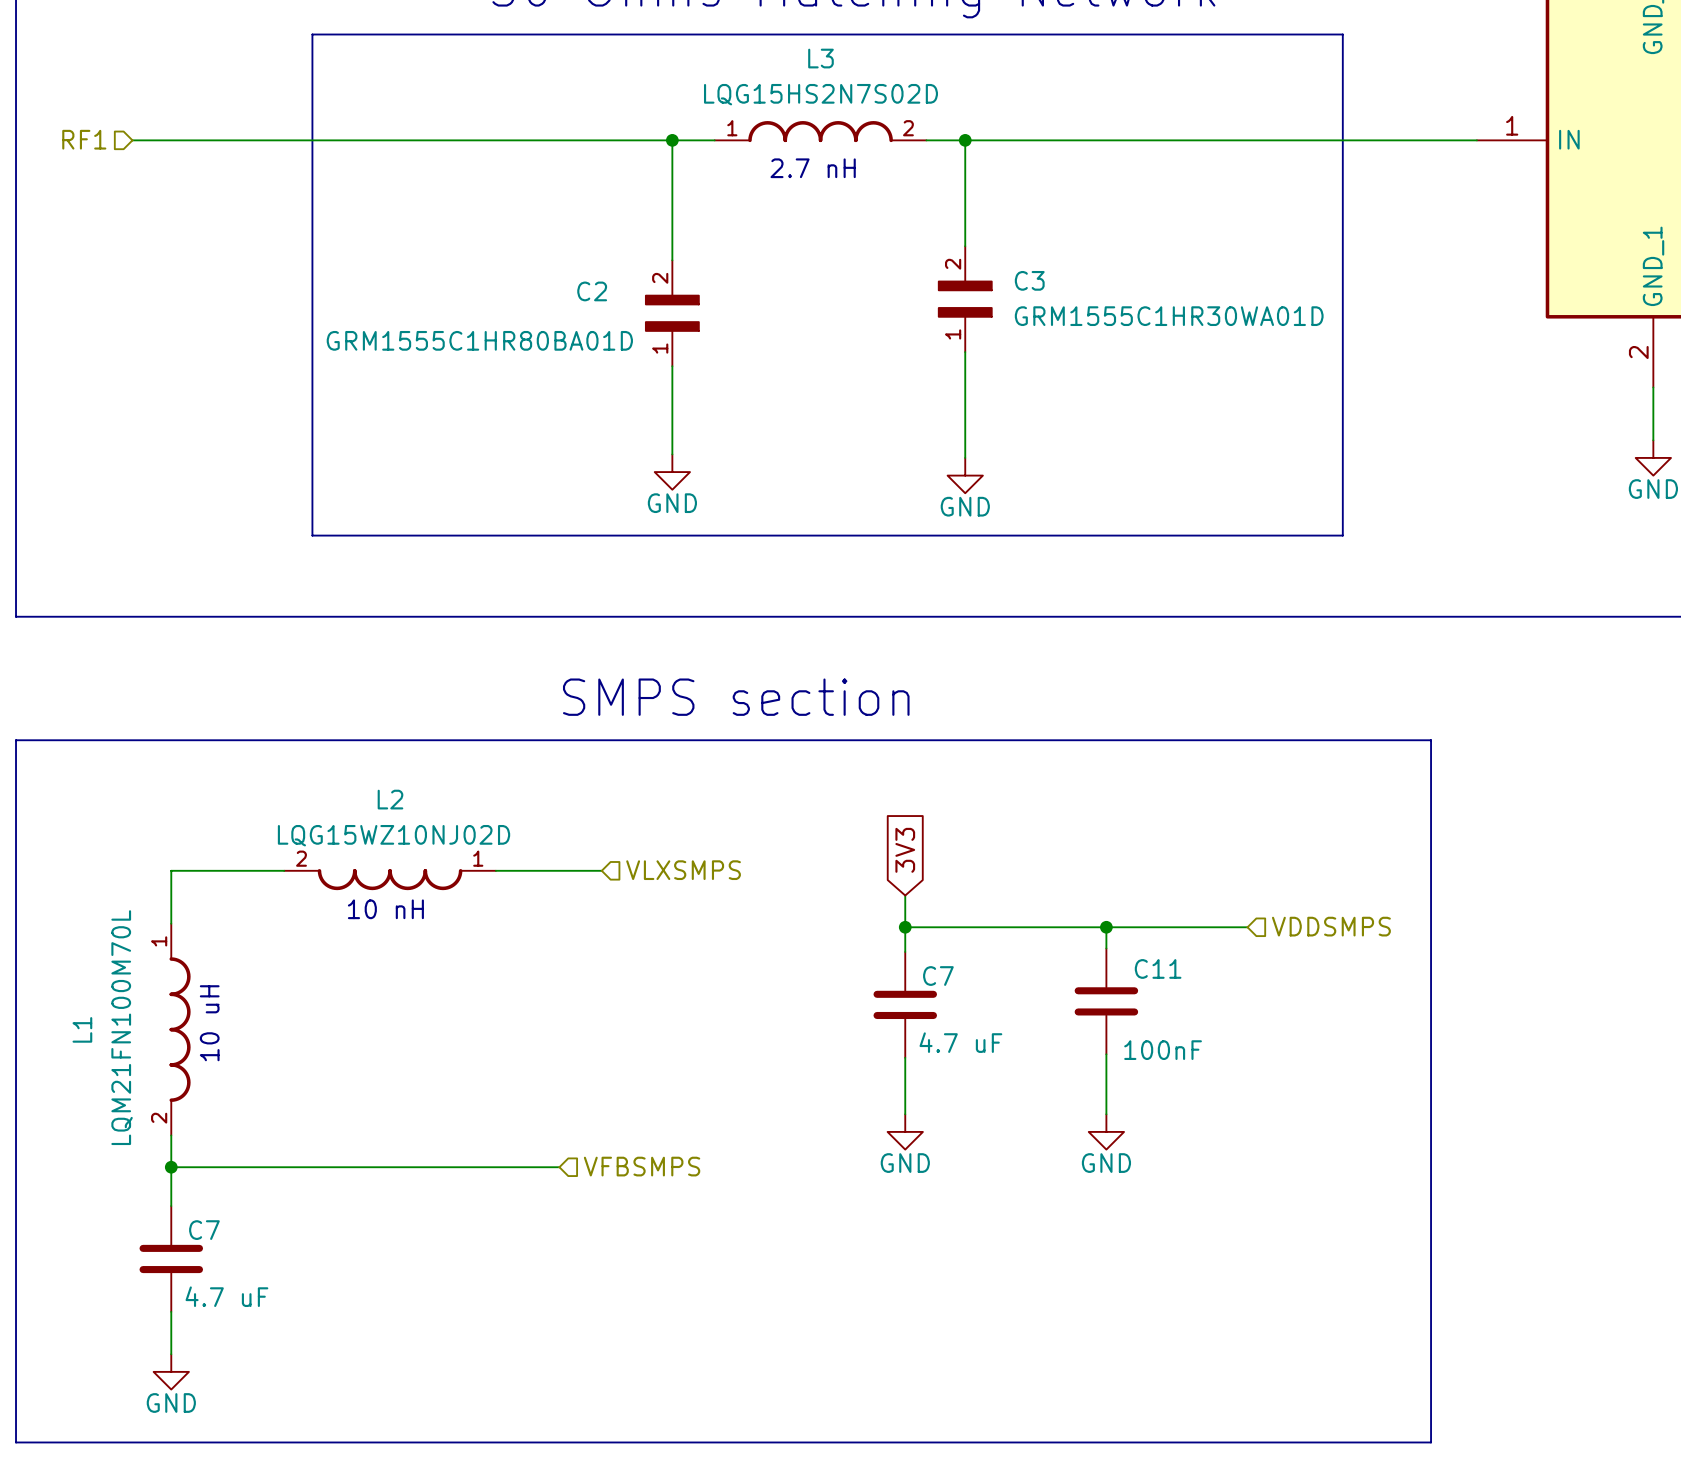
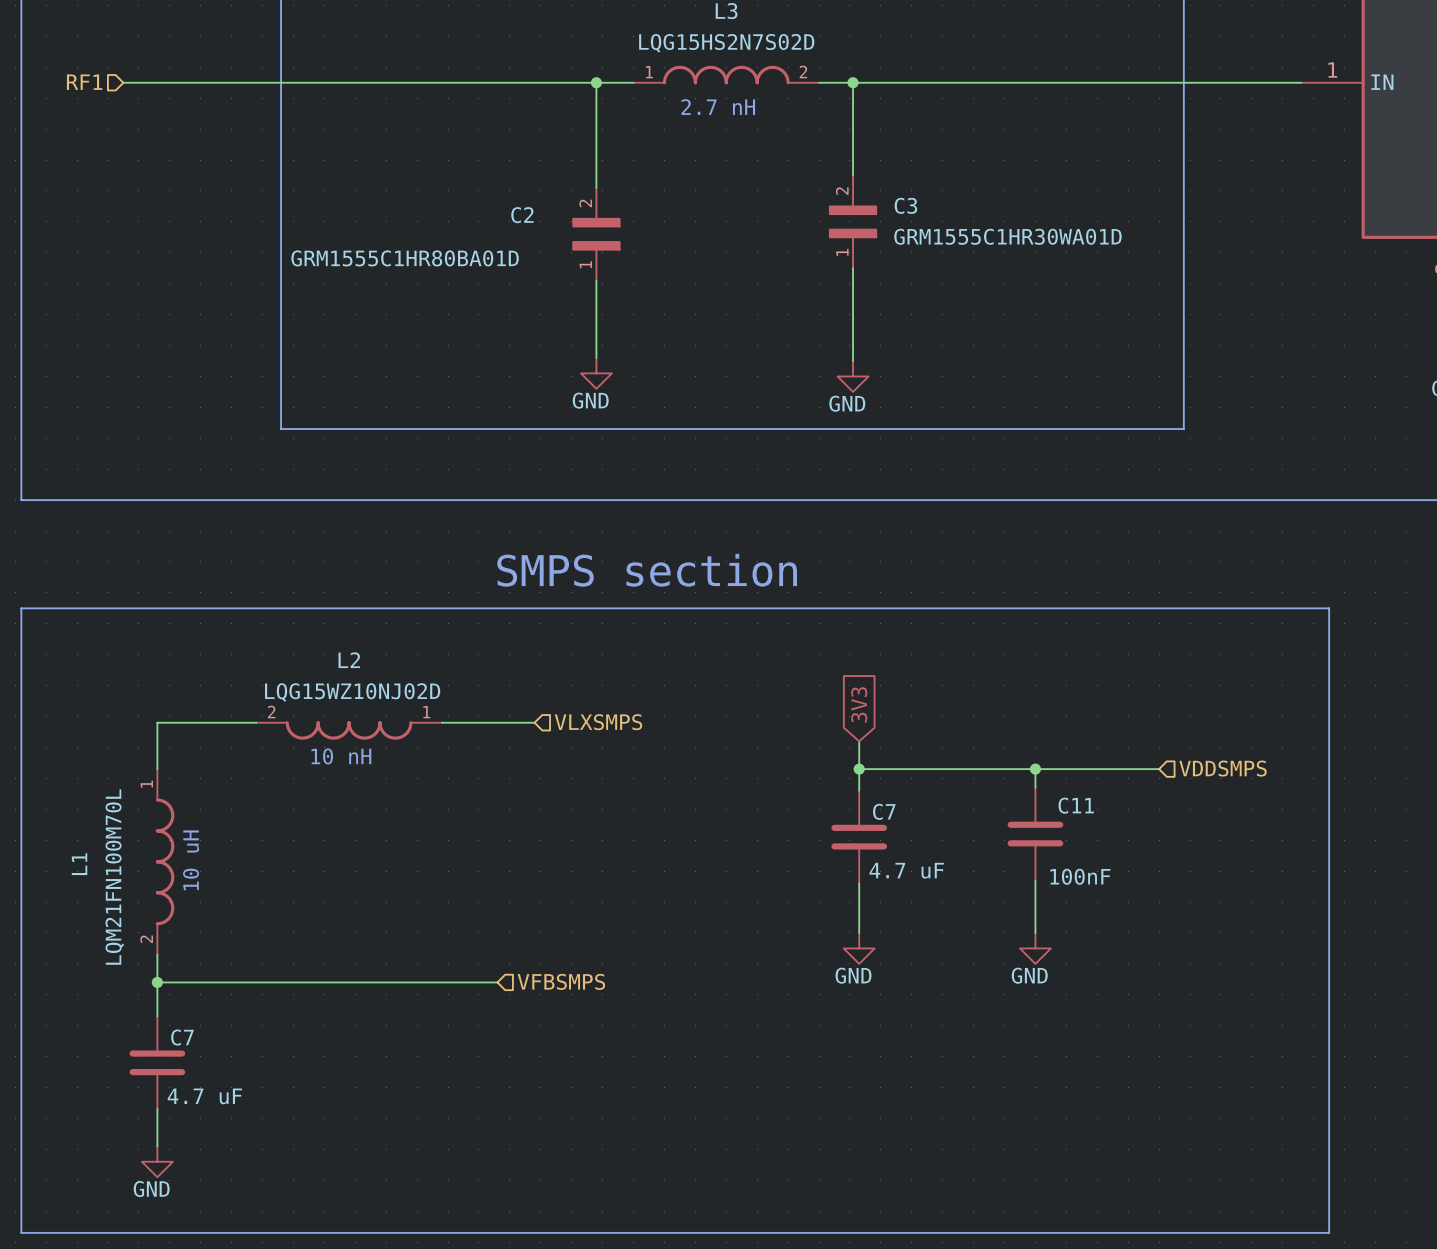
line: (1431, 740) (1431, 1442) (16, 1442) -> (1261, 608) (1329, 608) (1329, 1232) (21, 1232) (21, 1223)
global label position: 3V3 (905, 850) -> 3V3 (859, 704)
wire: (905, 895) (905, 951) -> (859, 741) (859, 790)
junction: none -> (859, 769)
junction: none -> (1035, 769)
hierarchical label position: VDDSMPS (1331, 926) -> VDDSMPS (1223, 768)
wire: (905, 927) (1247, 927) -> (859, 769) (1159, 769)
junction: (905, 927) -> none
wire: (1106, 927) (1106, 948) -> (1035, 769) (1035, 787)
junction: (1106, 927) -> none
C11 position: (1106, 1001) -> (1035, 834)
C7 position: (905, 1004) -> (859, 837)
wire: (1106, 1054) (1106, 1114) -> (1035, 880) (1035, 932)
wire: (905, 1057) (905, 1114) -> (859, 883) (859, 932)
power symbol: none -> GND (859, 948)
power symbol: none -> GND (1035, 948)
power symbol: GND (905, 1131) -> none
power symbol: GND (1106, 1131) -> none

